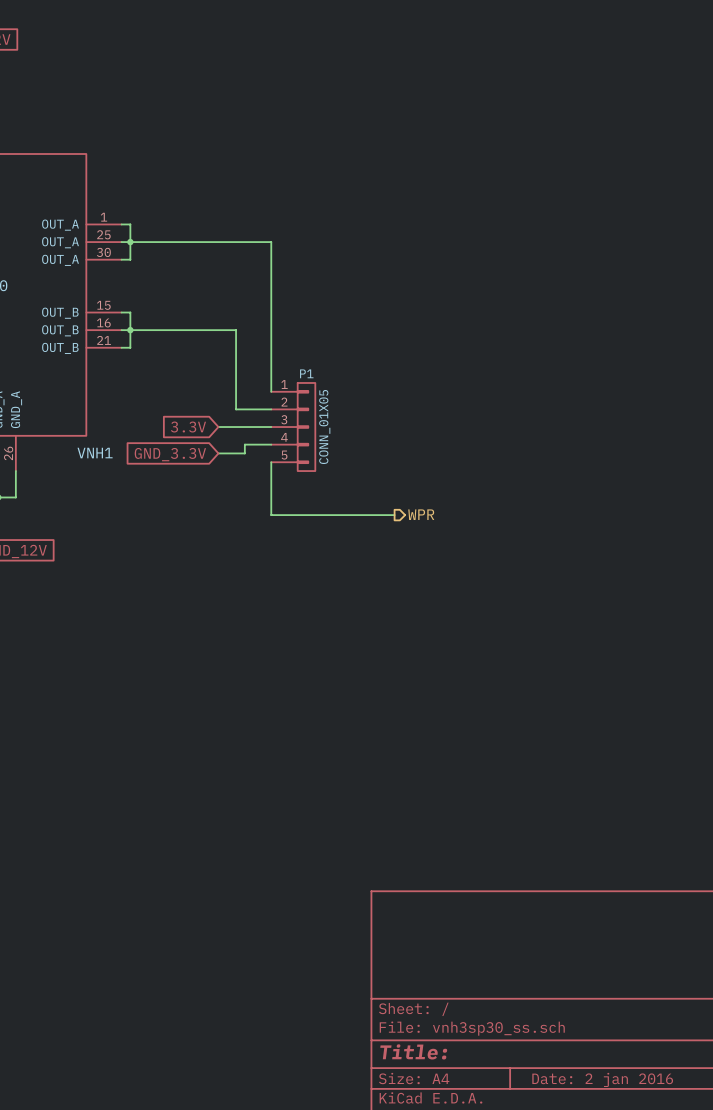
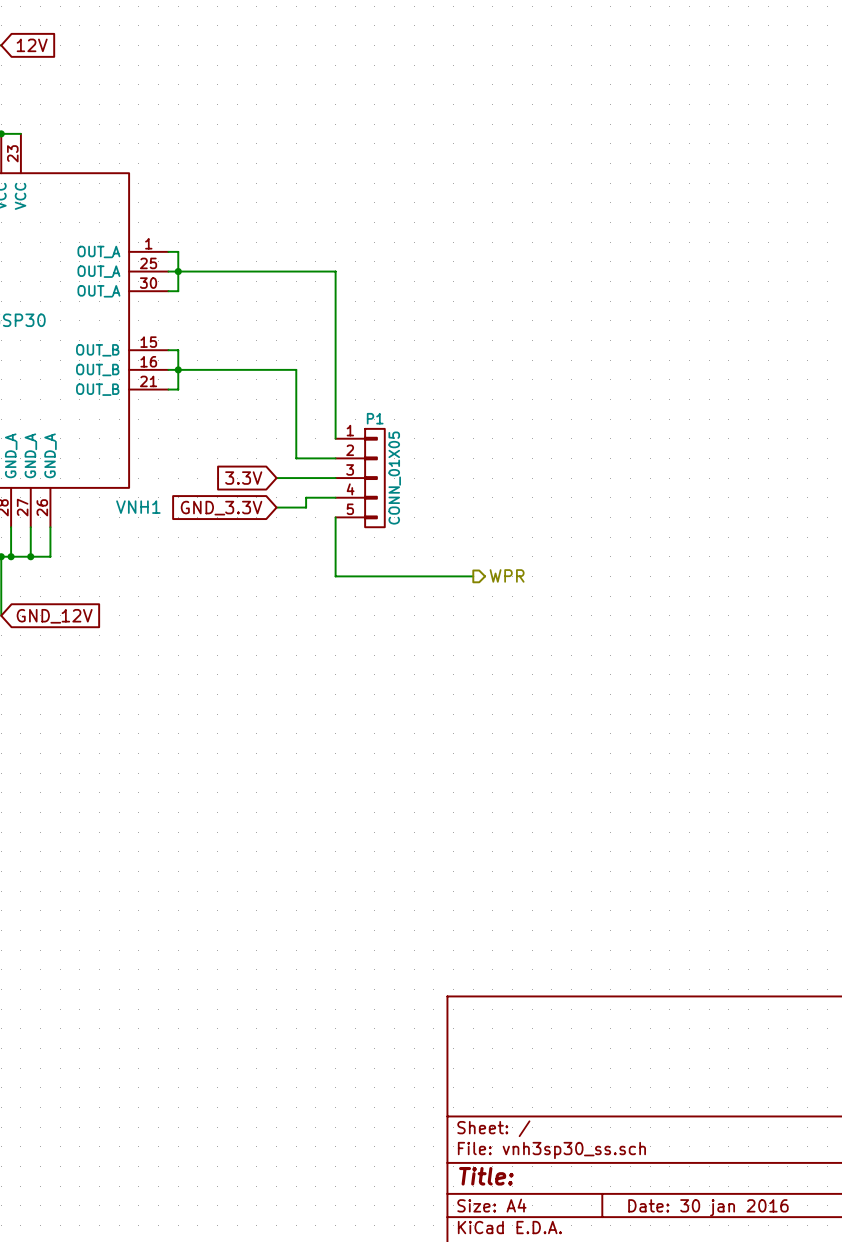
title block: Date: 2 jan 2016 (602, 1079) -> Date: 30 jan 2016 (708, 1207)

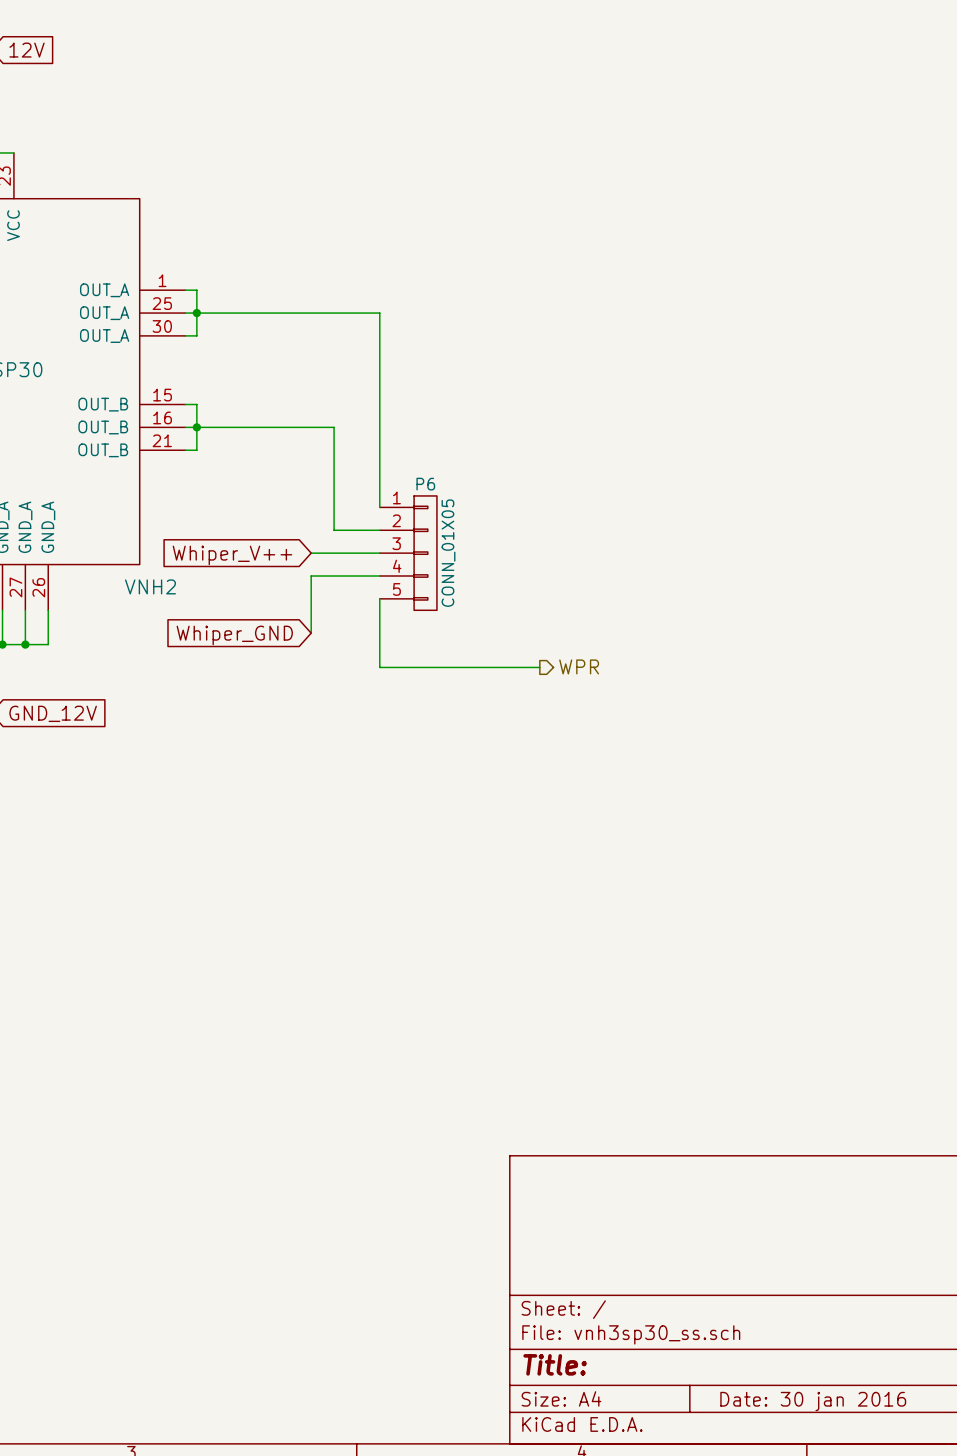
P1 name: P1 (375, 418) -> P6 (425, 484)
global label: 3.3V (243, 478) -> Whiper_V++ (232, 555)
wire: (306, 497) (306, 507) (276, 507) -> (345, 576) (311, 576) (311, 633)
VNH1 name: VNH1 (138, 507) -> VNH2 (150, 586)
global label: GND_3.3V (221, 508) -> none
global label: none -> Whiper_GND (234, 635)

